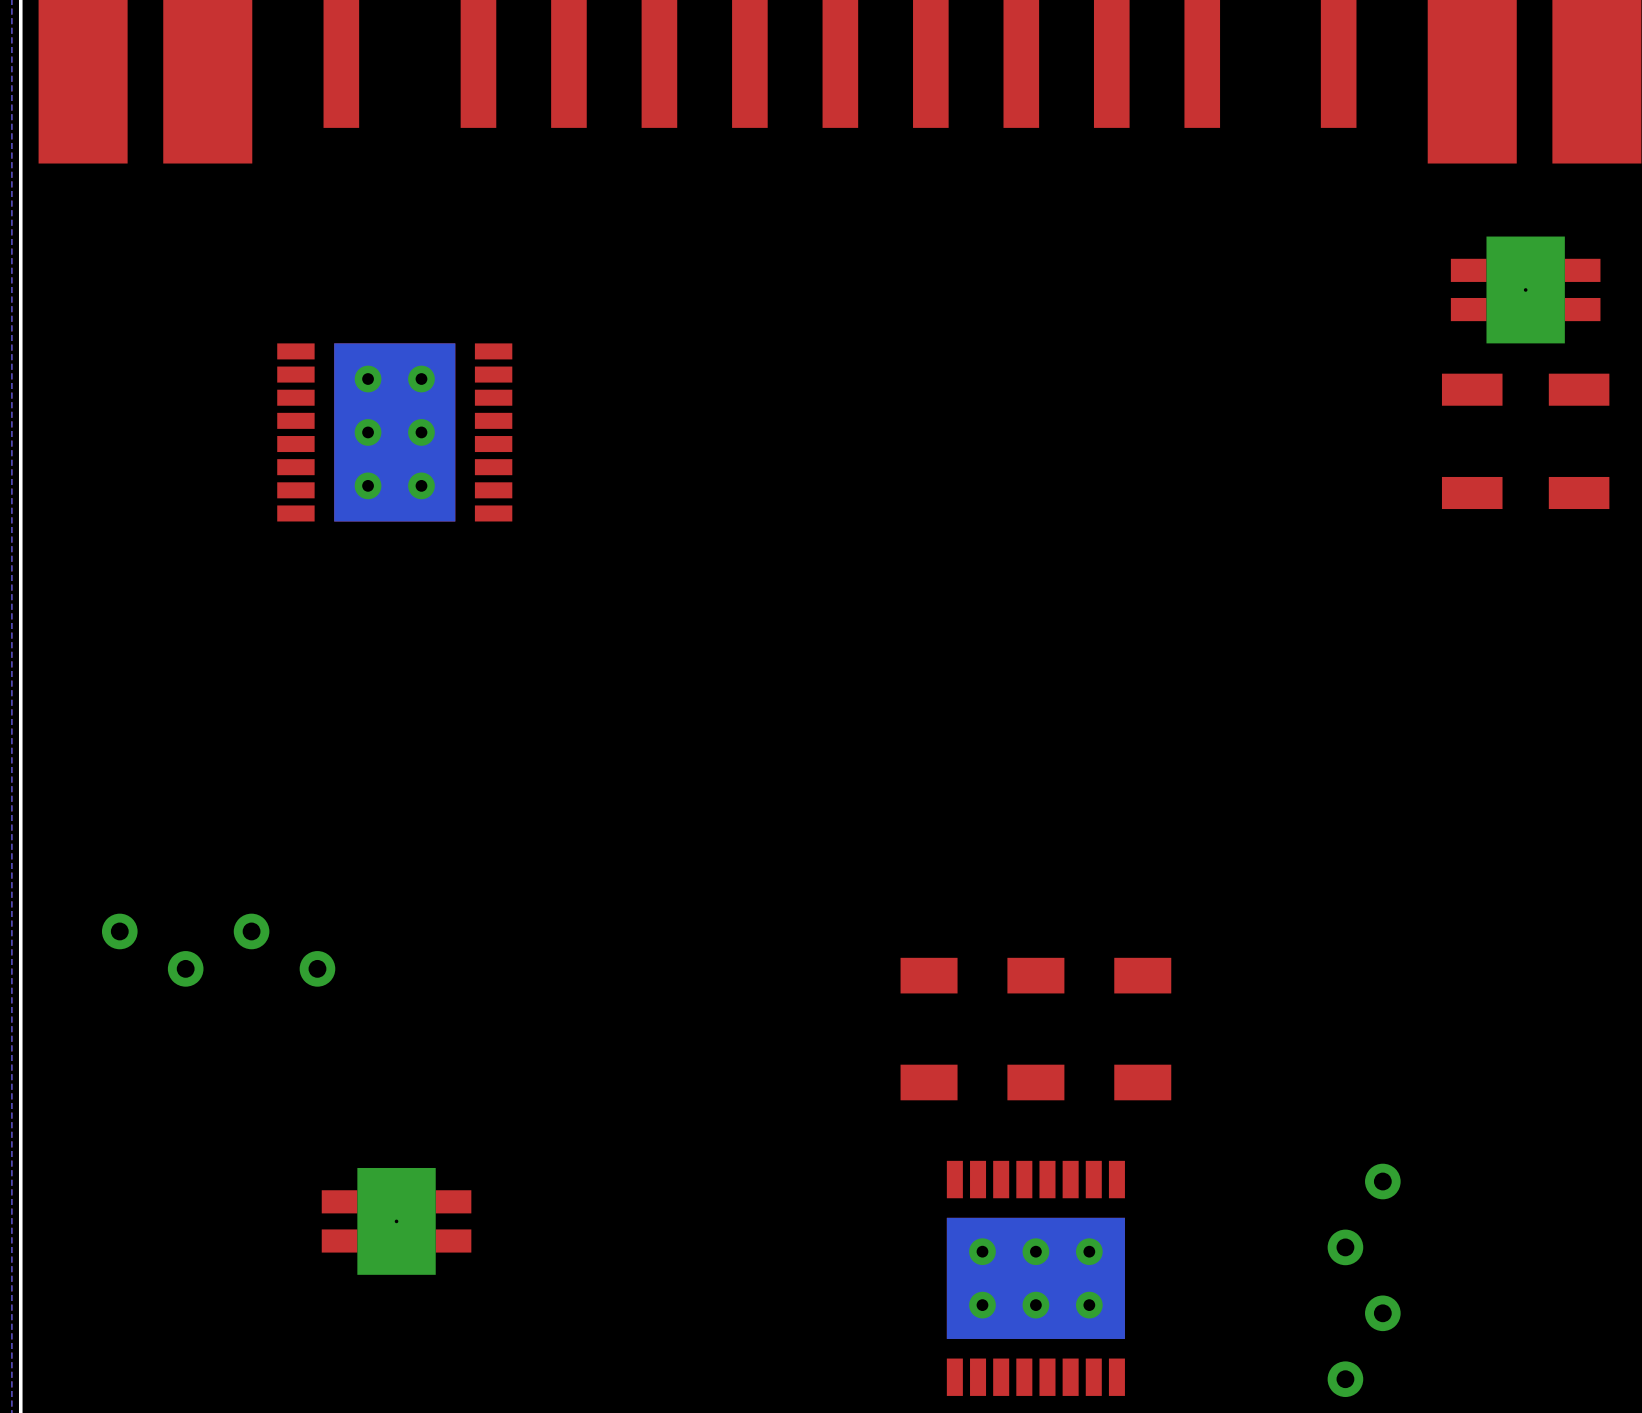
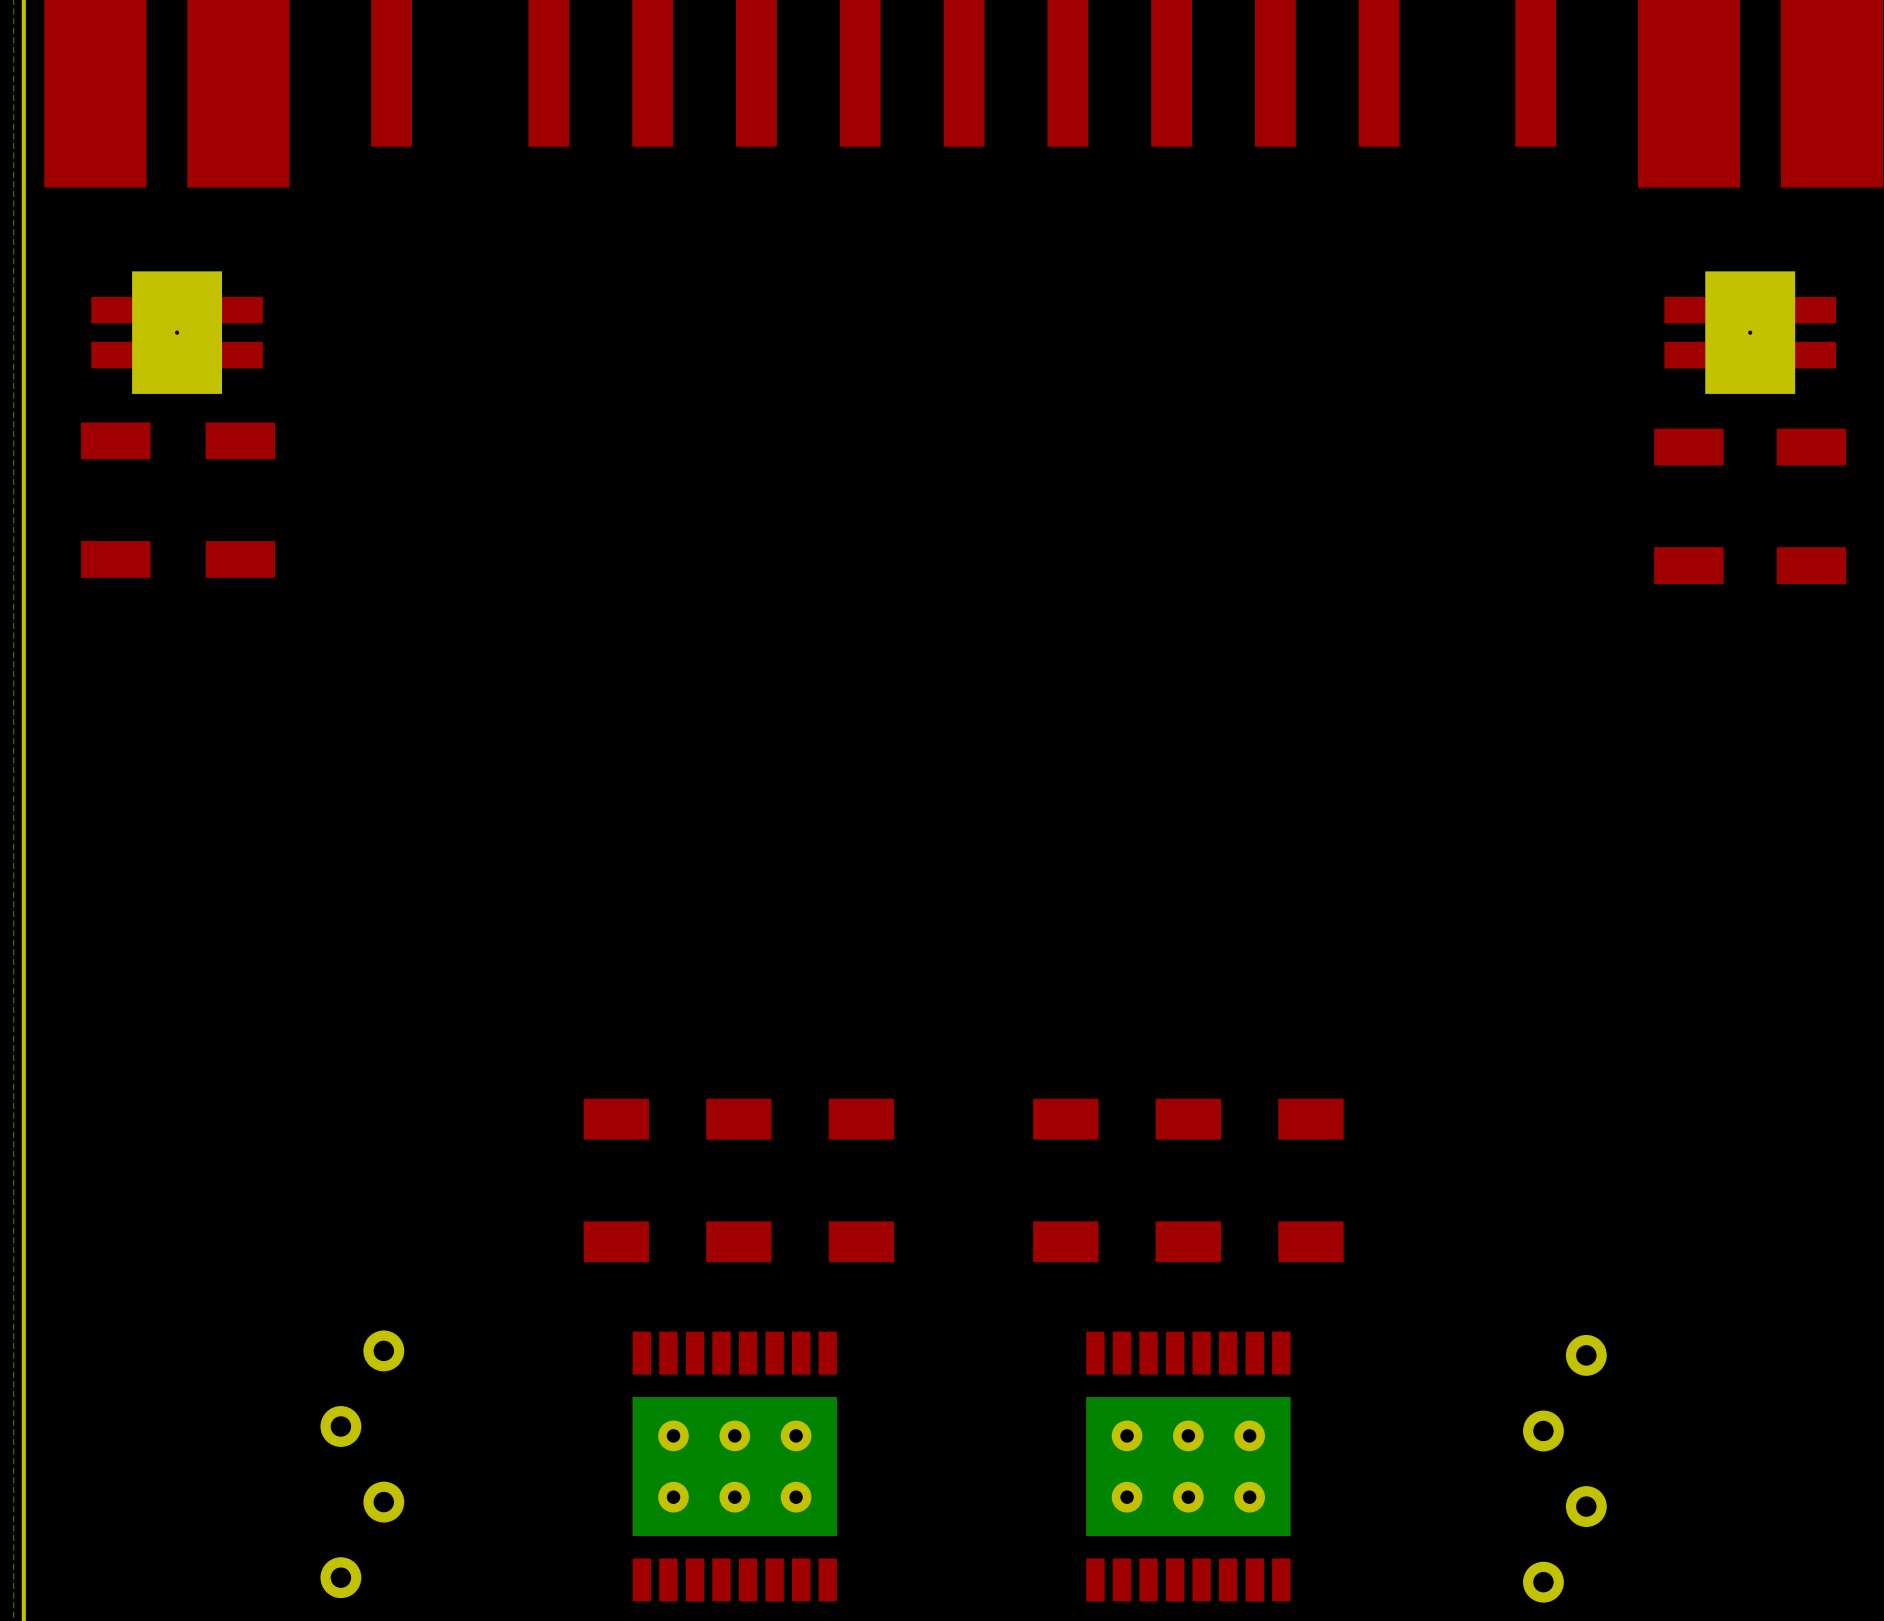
part: none -> (177, 332)
part rotation: 0° (394, 432) -> 90° clockwise (734, 1466)
part position: (394, 432) -> (734, 1466)
part: none -> (115, 500)
part: none -> (240, 500)
part rotation: 0° (218, 950) -> 90° clockwise (362, 1464)
part position: (218, 950) -> (362, 1464)
part: none -> (616, 1180)
part: none -> (738, 1180)
part: none -> (861, 1180)
part: (396, 1221) -> none

